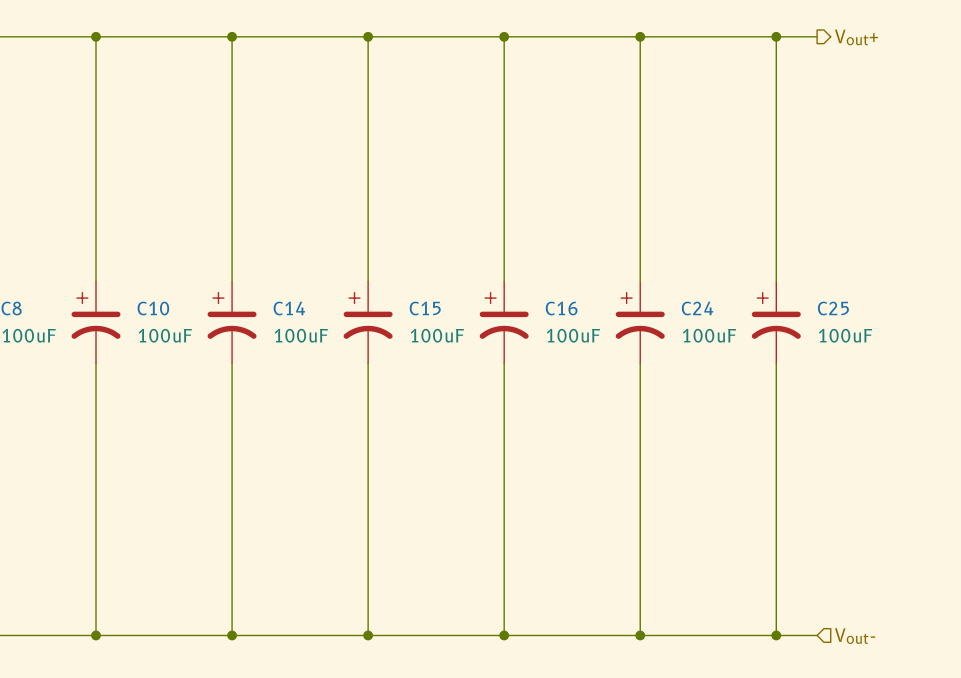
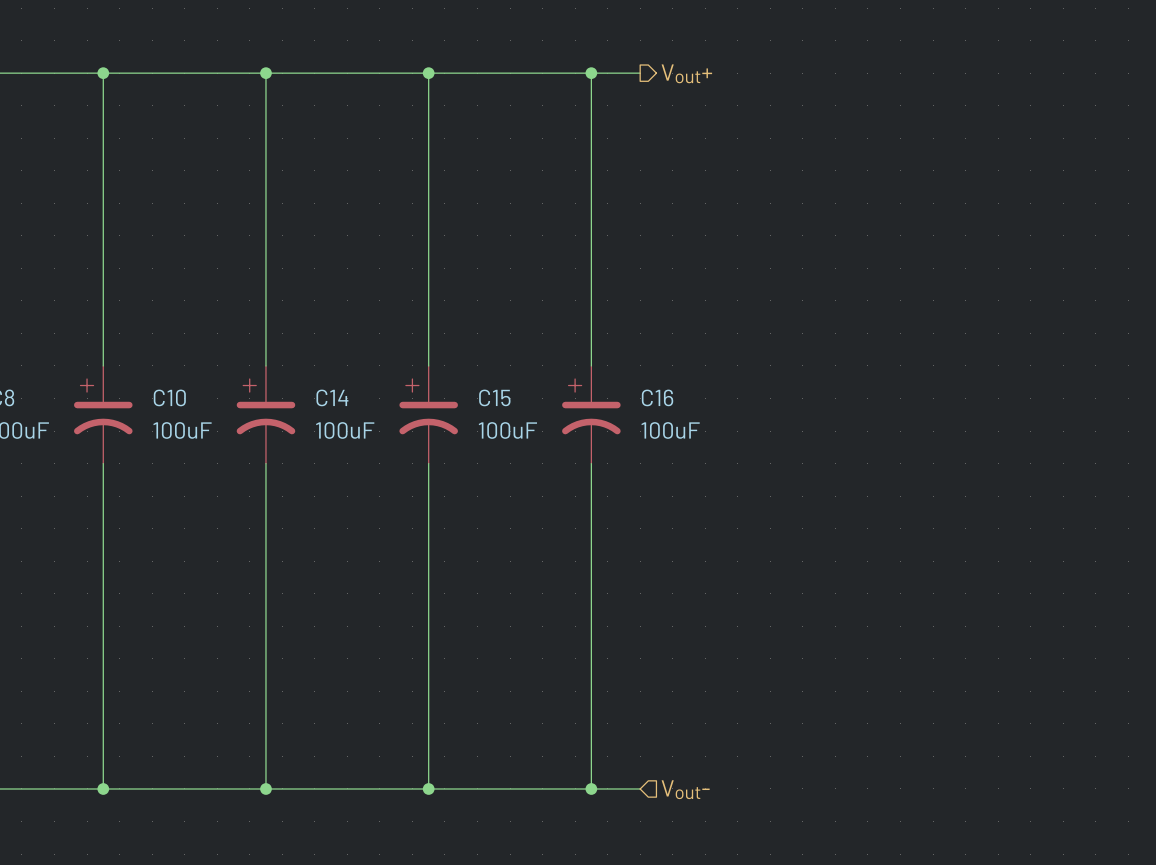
wire: (544, 36) (817, 36) -> none
wire: (640, 36) (640, 281) -> none
junction: (640, 36) -> none
wire: (776, 36) (776, 281) -> none
junction: (776, 36) -> none
hierarchical label: none -> Vout+ (686, 73)
hierarchical label: Vout+ (856, 37) -> none
C24: 100uF (640, 322) -> none
C25: 100uF (776, 322) -> none
wire: (640, 363) (640, 635) -> none
wire: (776, 363) (776, 635) -> none
wire: (544, 635) (817, 635) -> none
junction: (640, 635) -> none
junction: (776, 635) -> none
hierarchical label: none -> Vout- (685, 789)
hierarchical label: Vout- (855, 636) -> none

